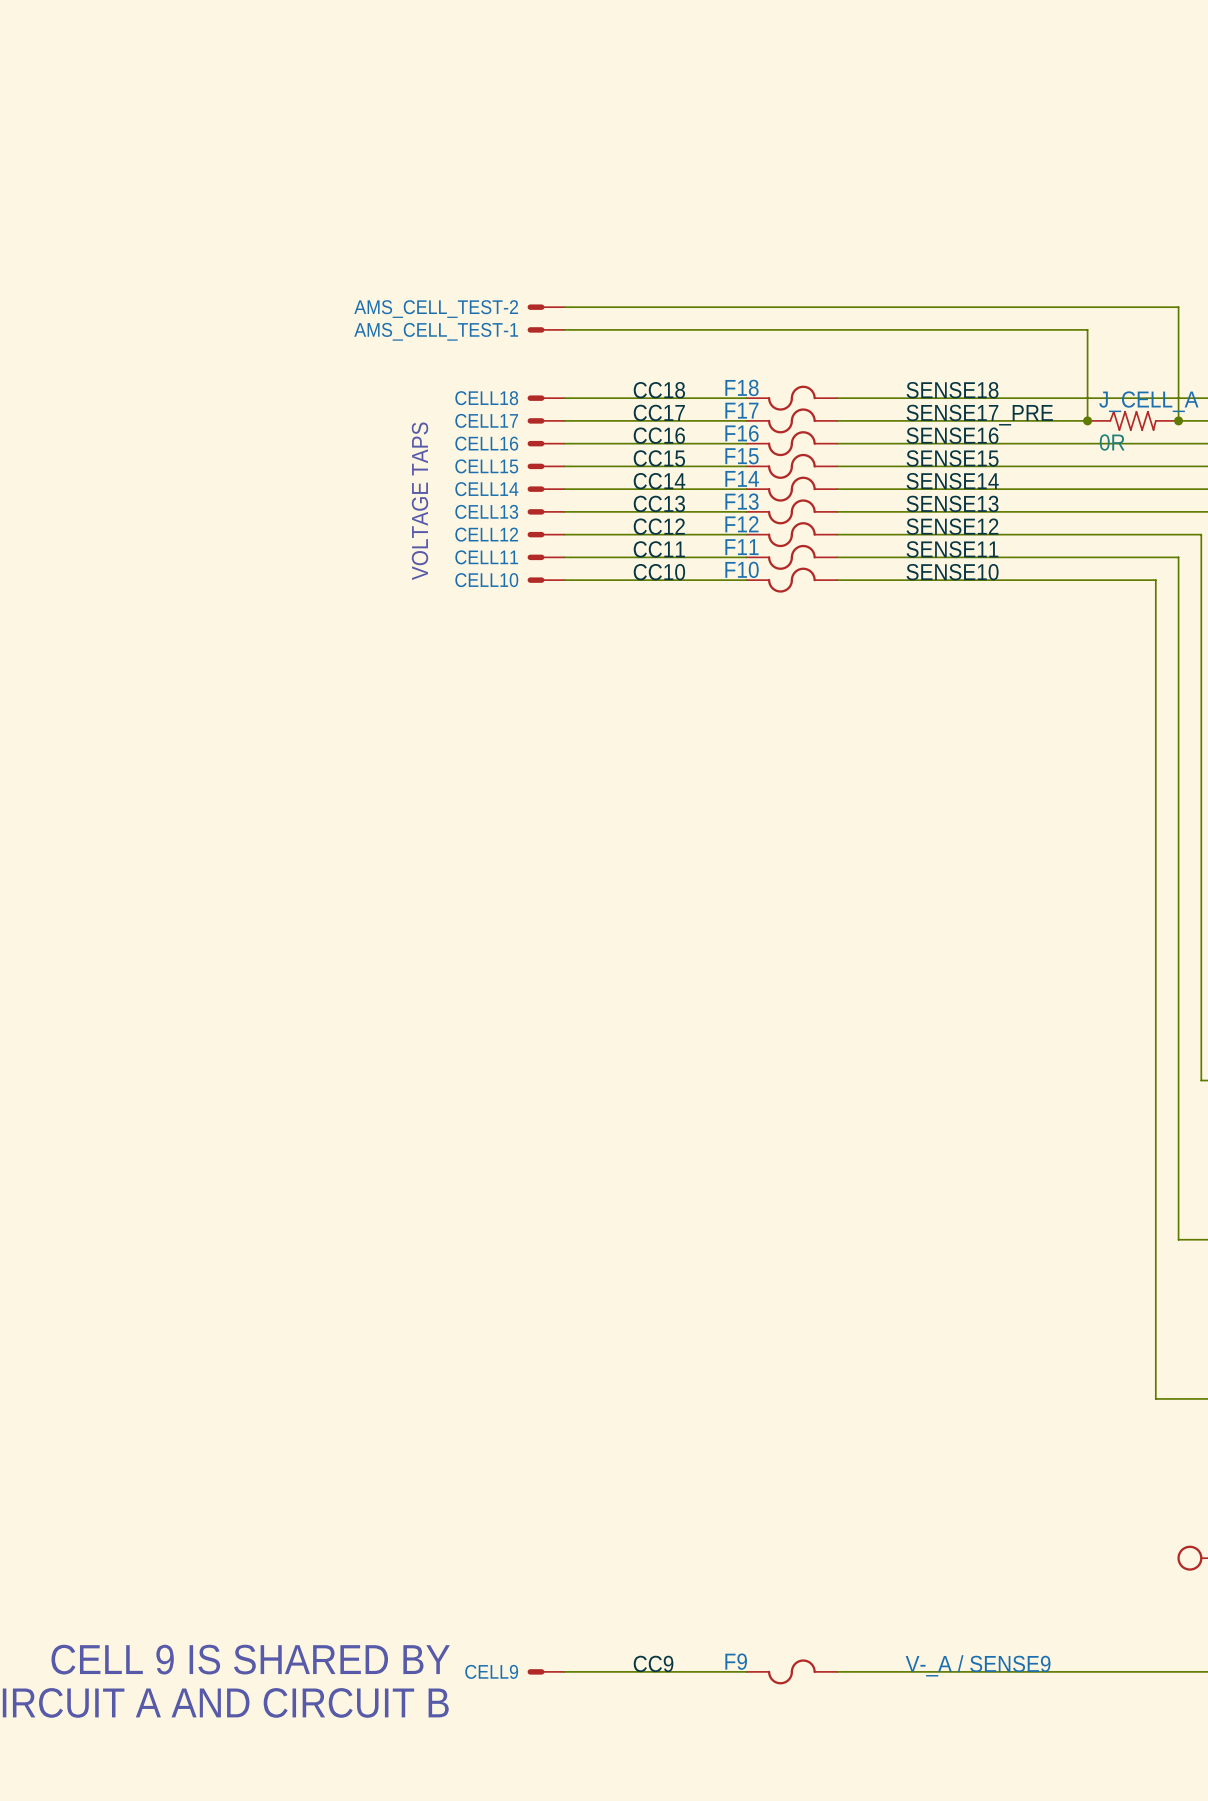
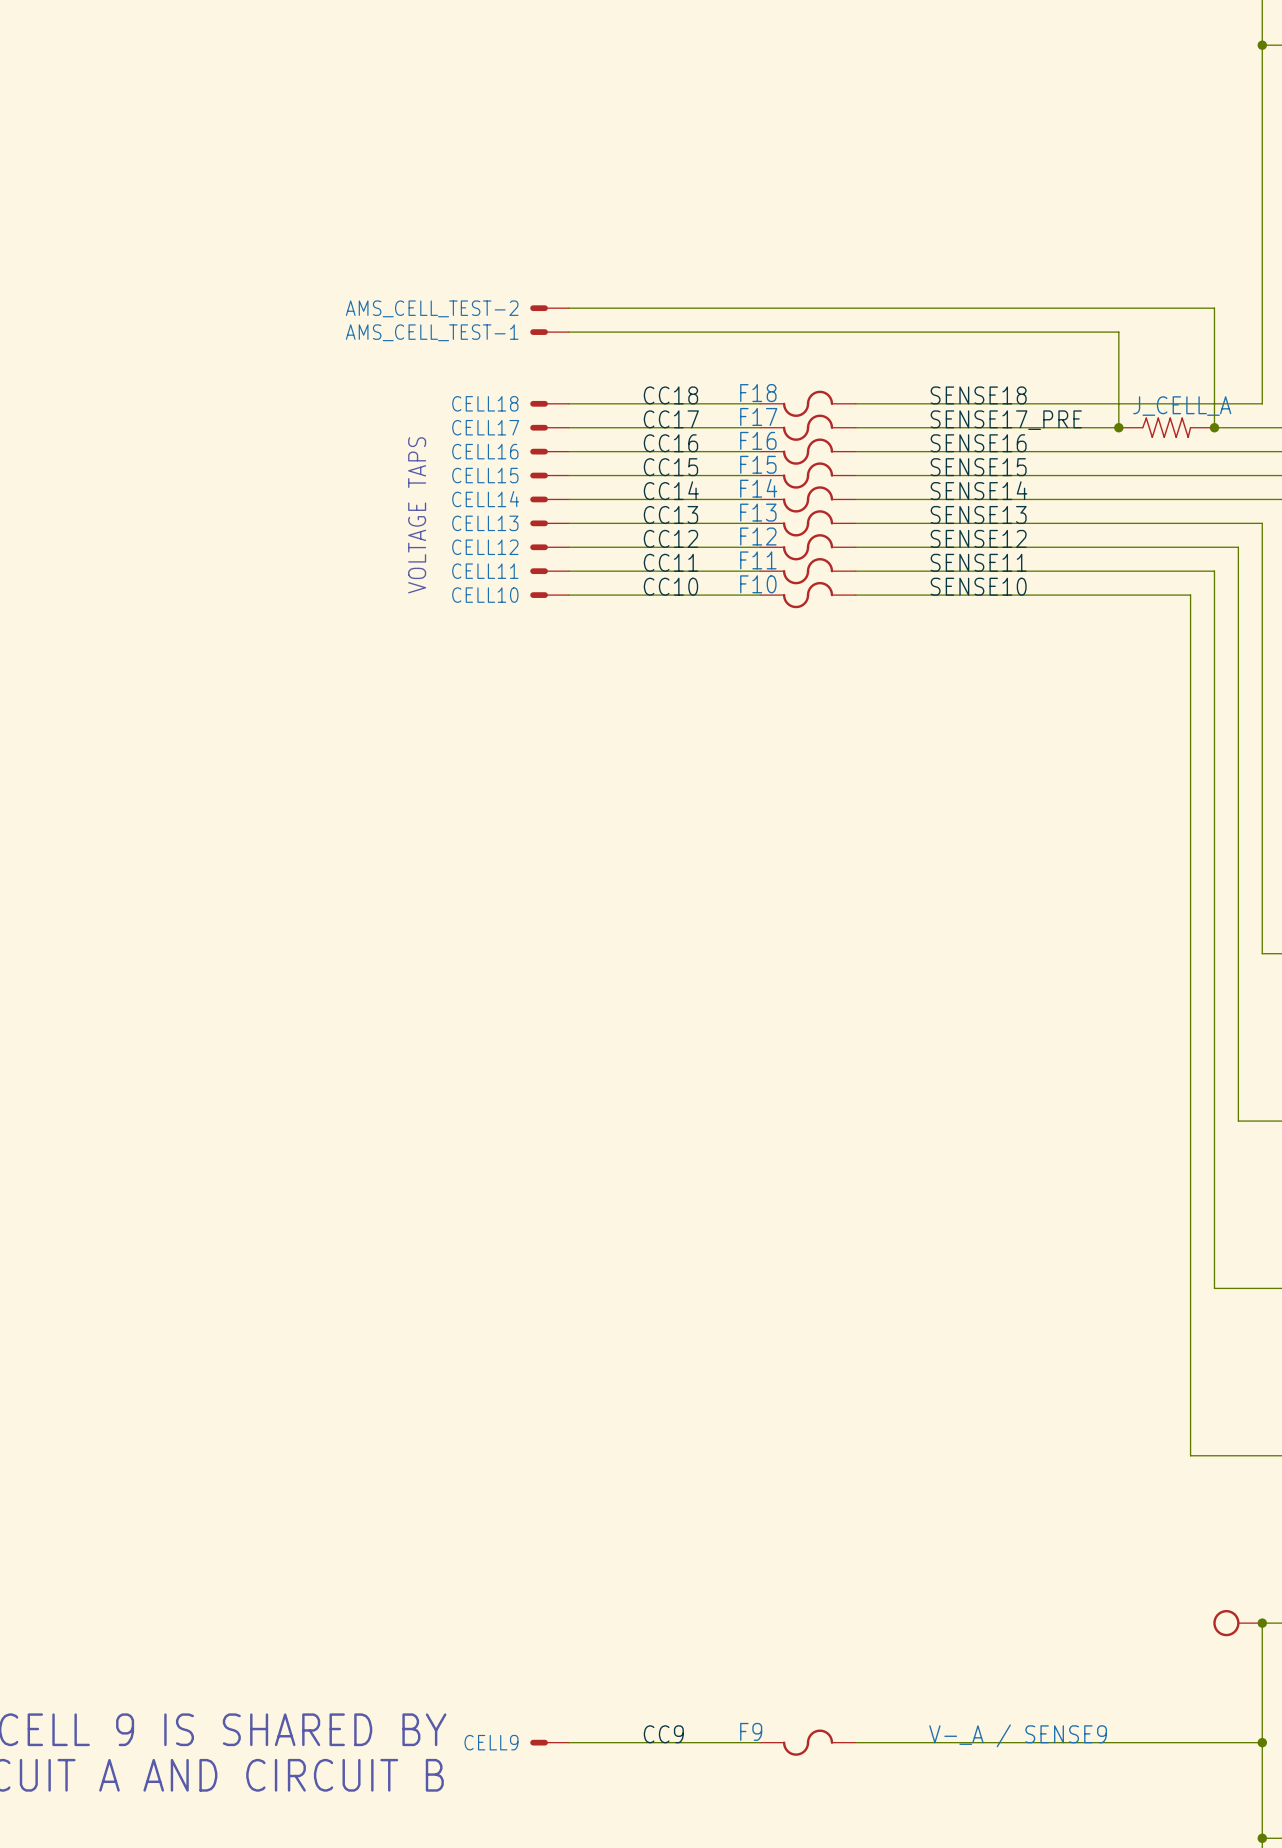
J_CELL_A value: 0R (1112, 442) -> none

